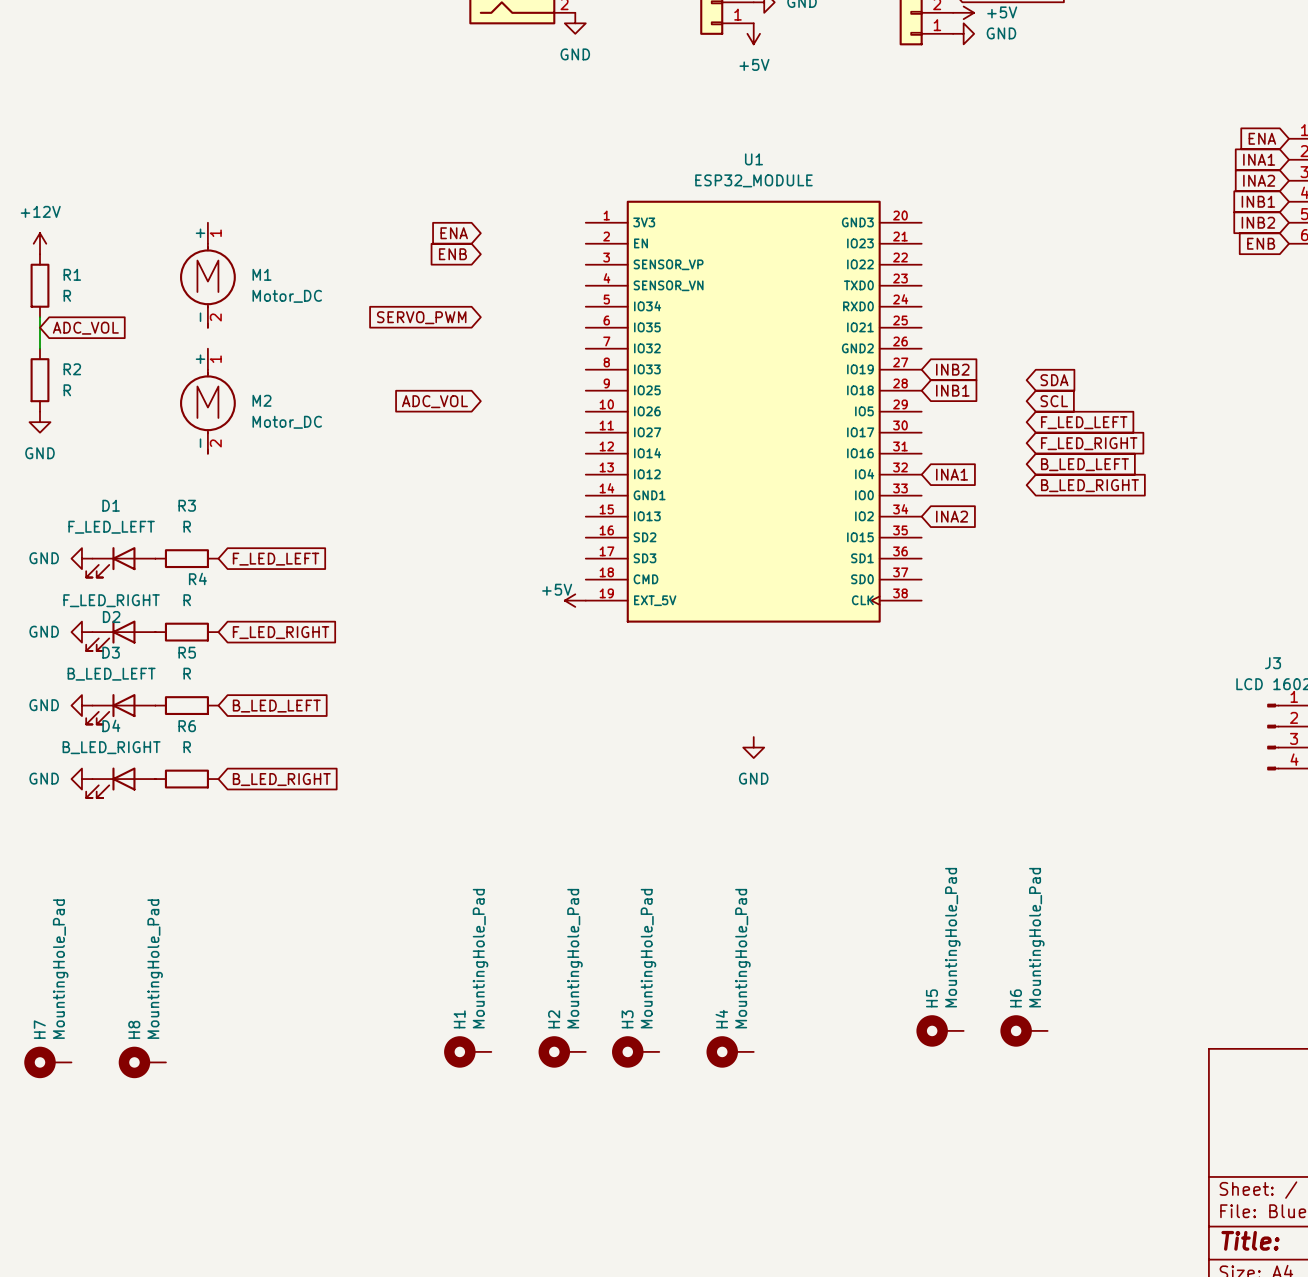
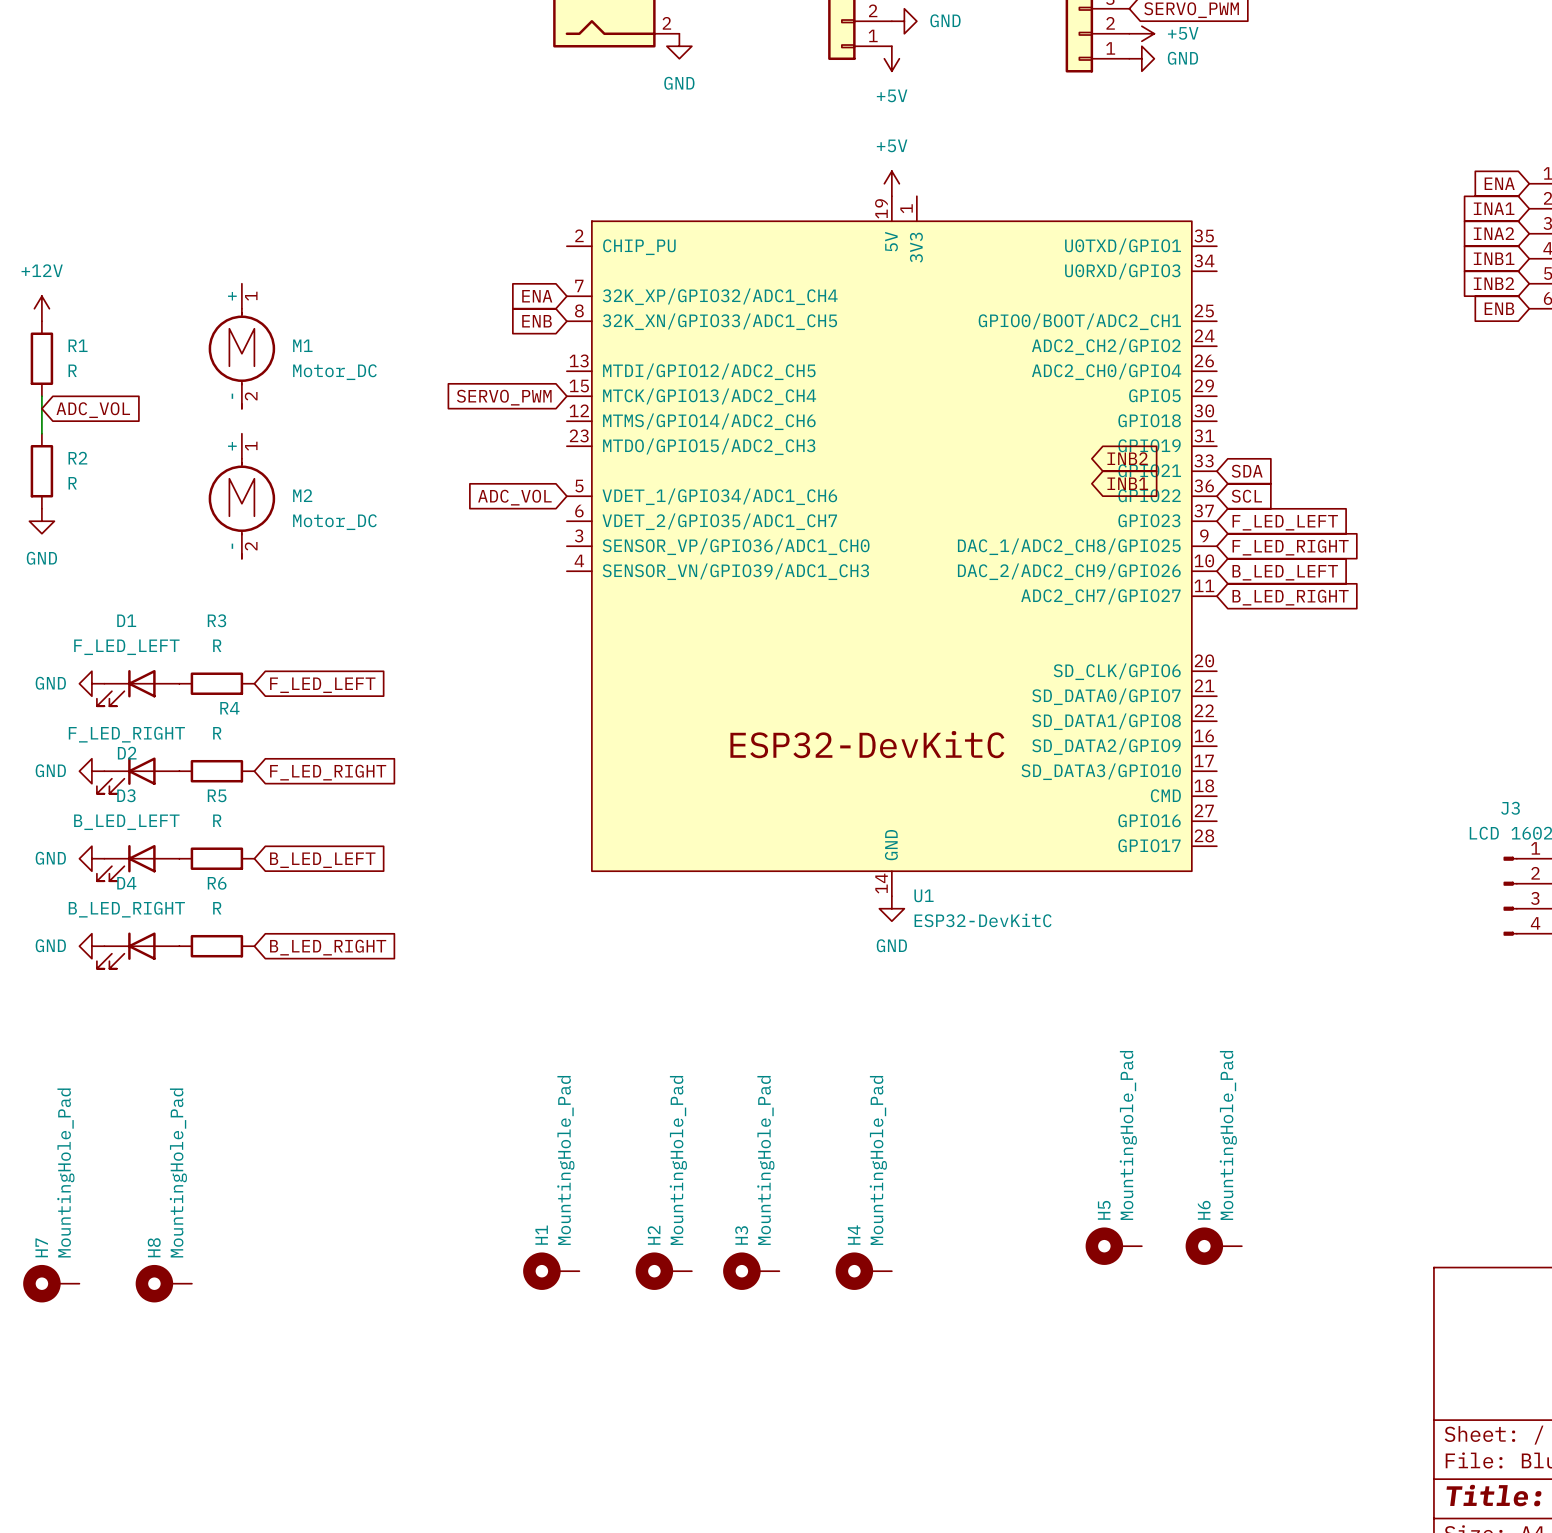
power symbol: none -> +5V (891, 183)
U1 name position: U1 (753, 159) -> U1 (924, 895)
U1 value: ESP32_MODULE (753, 180) -> ESP32-DevKitC (983, 920)
U1 symbol: [585, 200, 922, 623] -> [566, 196, 1217, 897]
global label: INA1 (952, 474) -> none
global label: INA2 (952, 516) -> none
power symbol: +5V (575, 600) -> none

